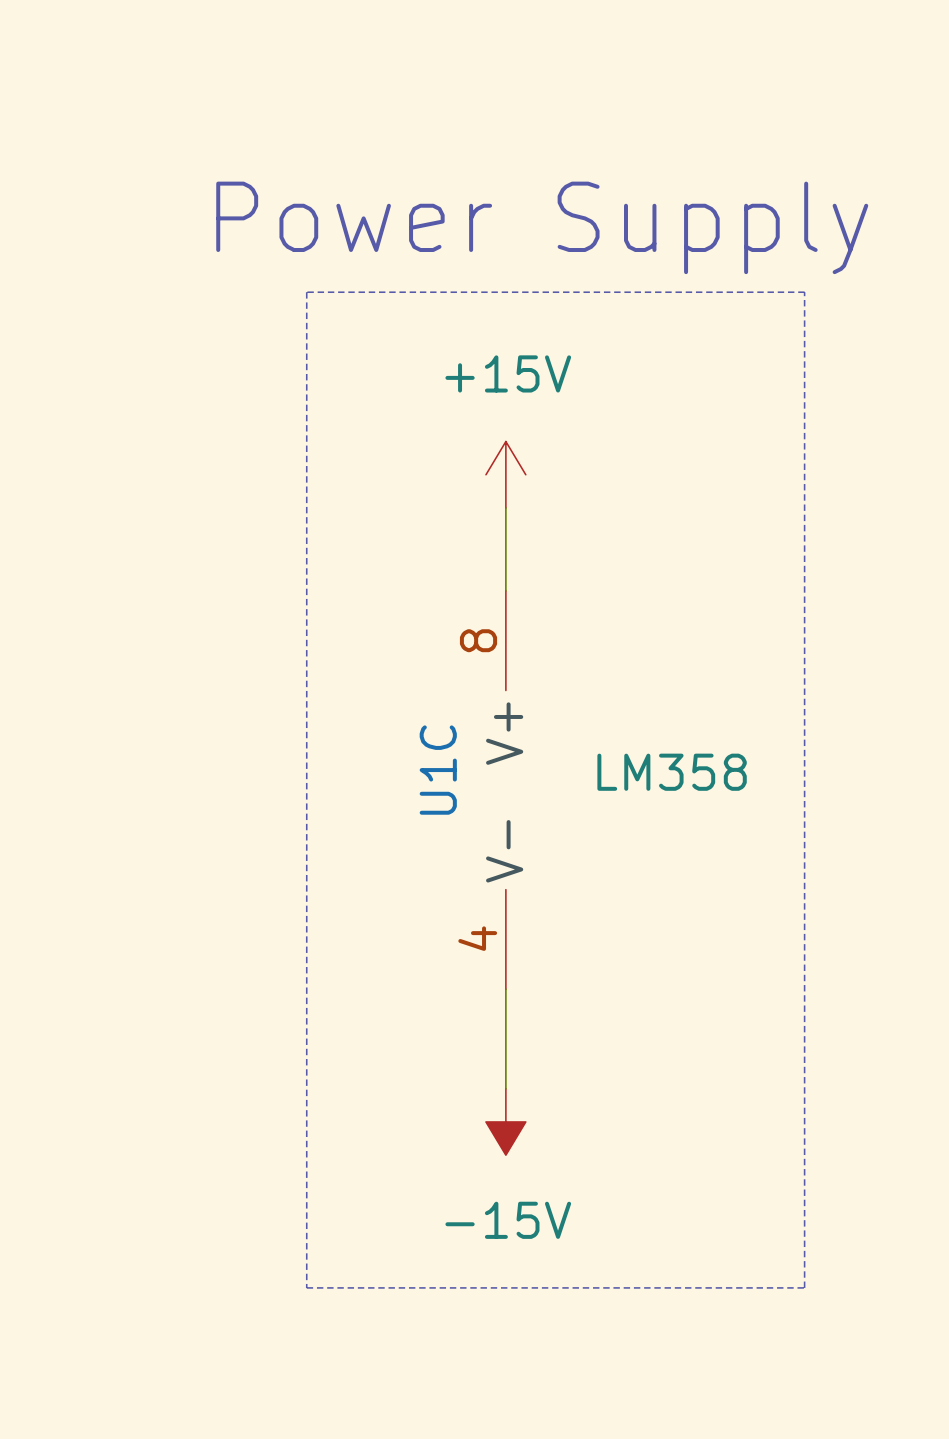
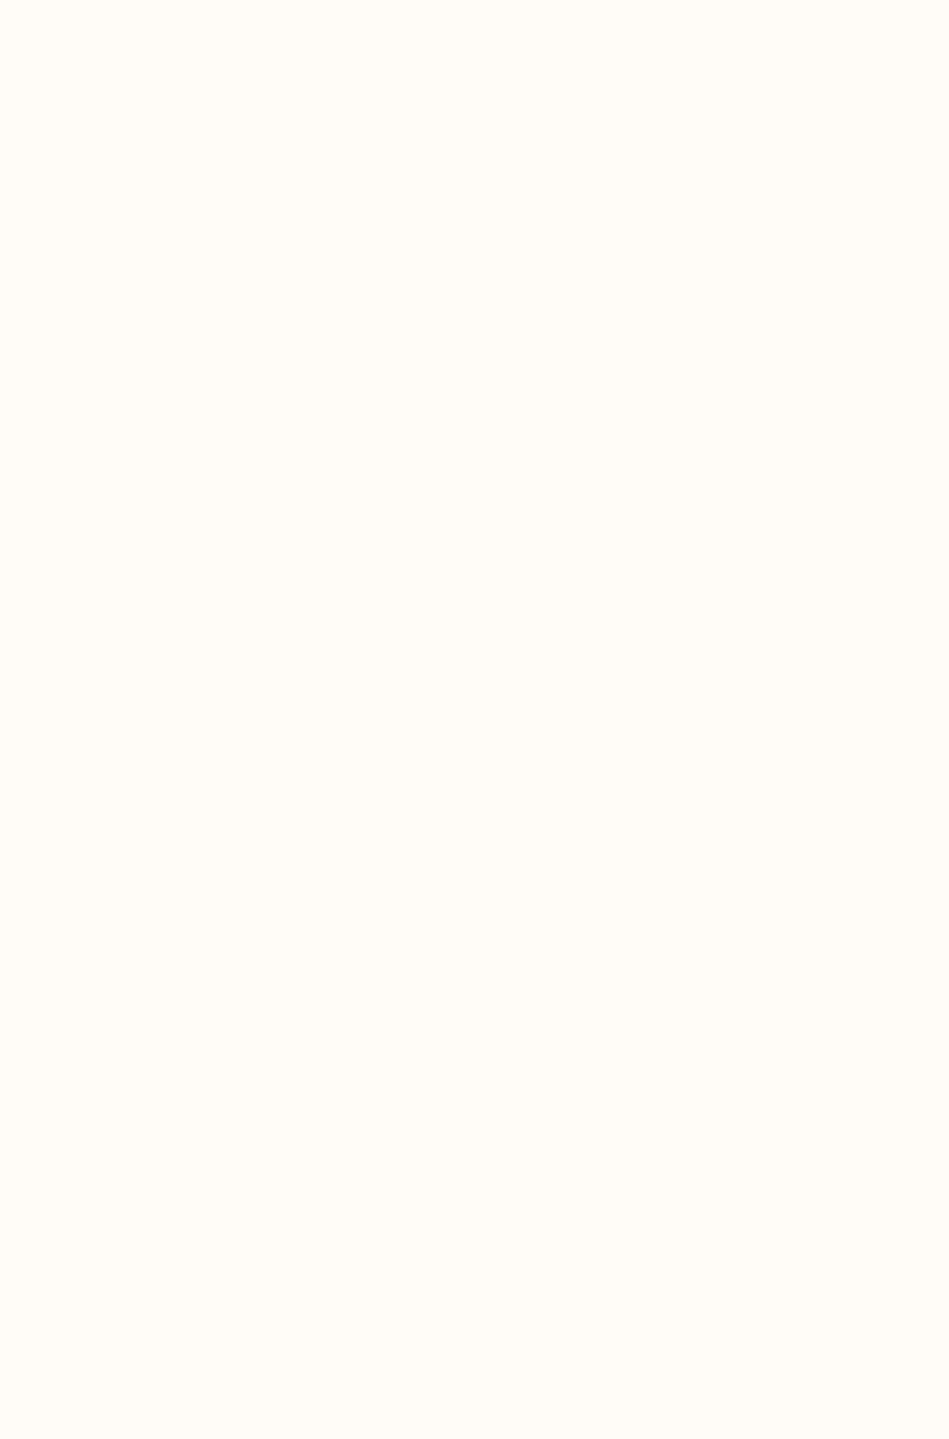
text: Power Supply (542, 227) -> none
line: (306, 292) (804, 292) (804, 1287) (306, 1287) (306, 292) -> none
power symbol: +15V (505, 474) -> none
wire: (505, 507) (505, 590) -> none
U1C: LM358 (505, 790) -> none
wire: (505, 989) (505, 1088) -> none
power symbol: -15V (505, 1121) -> none

